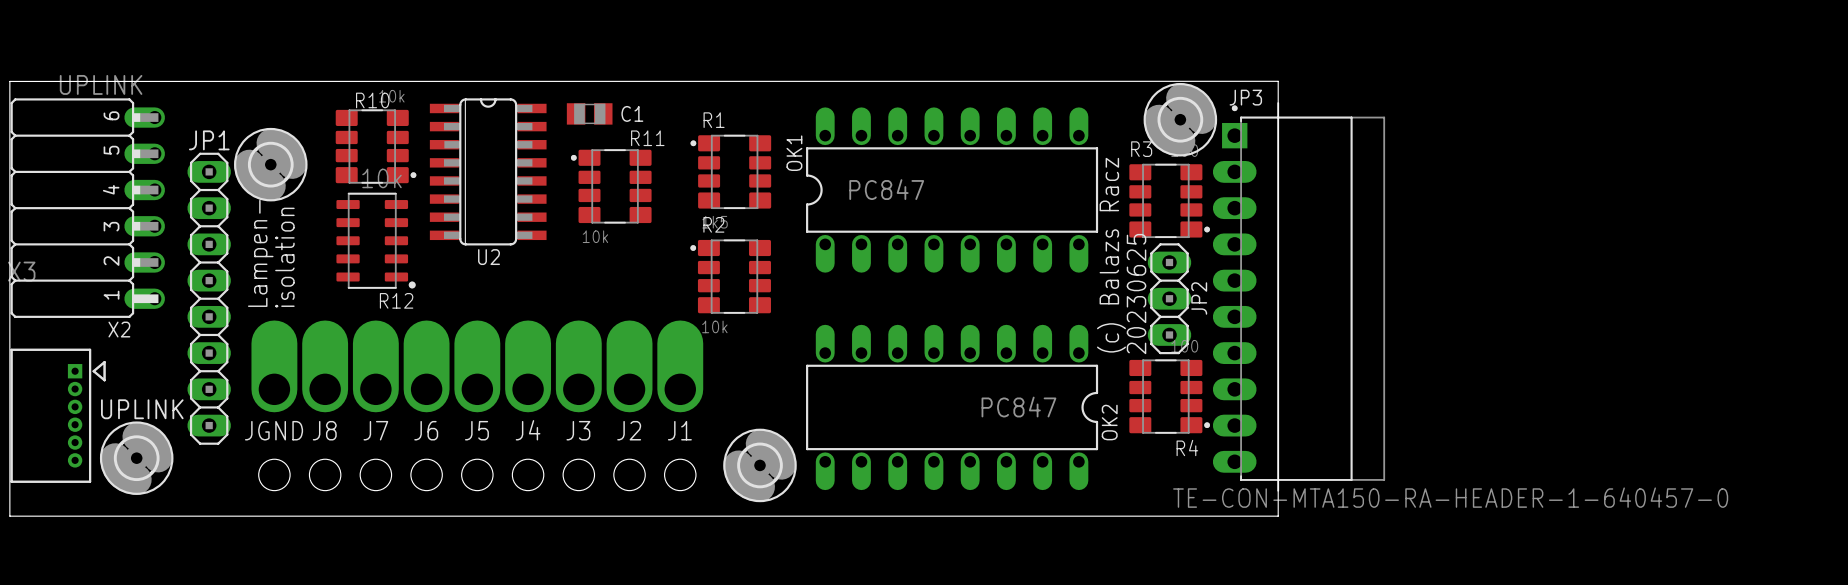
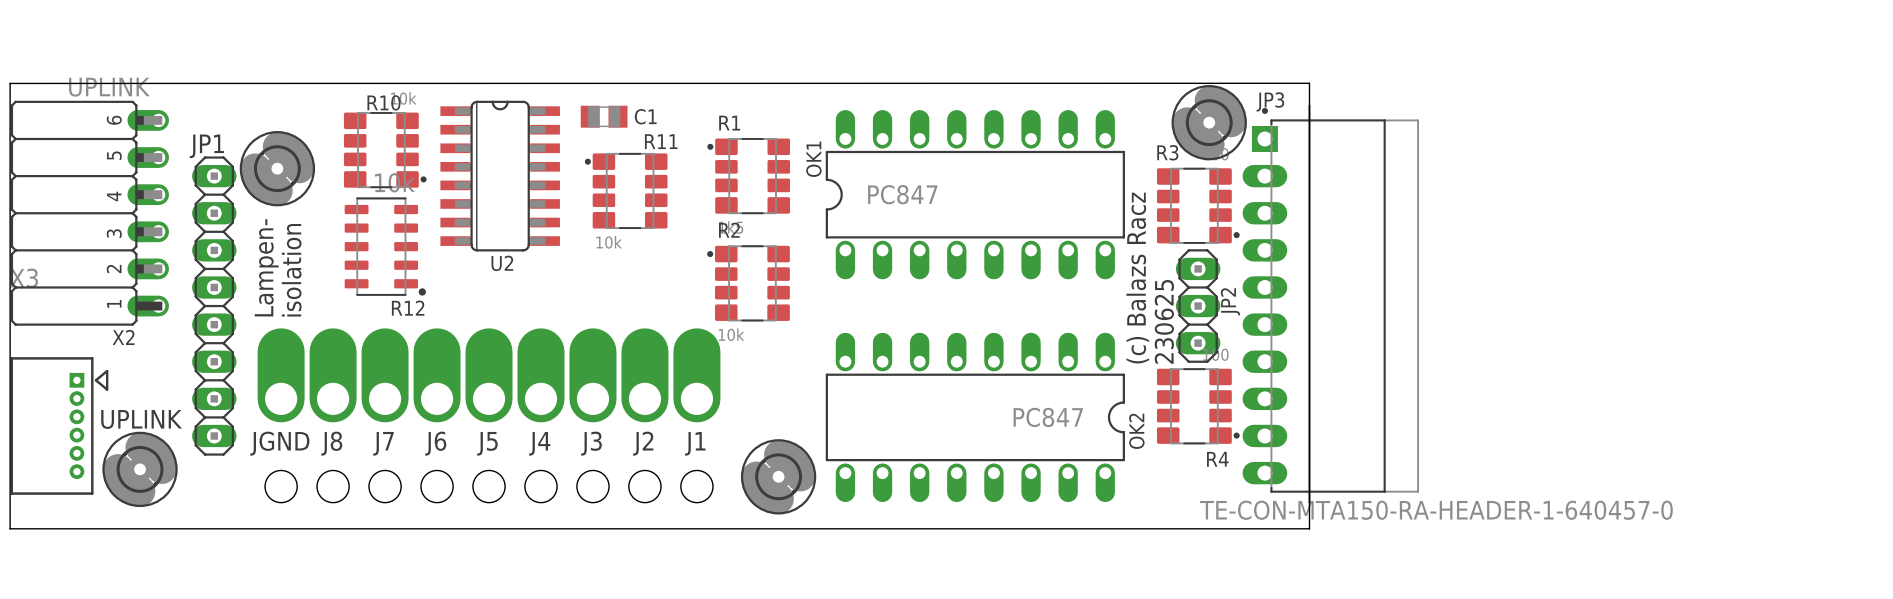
text: 20230625 (1136, 294) -> 230625 (1164, 321)

